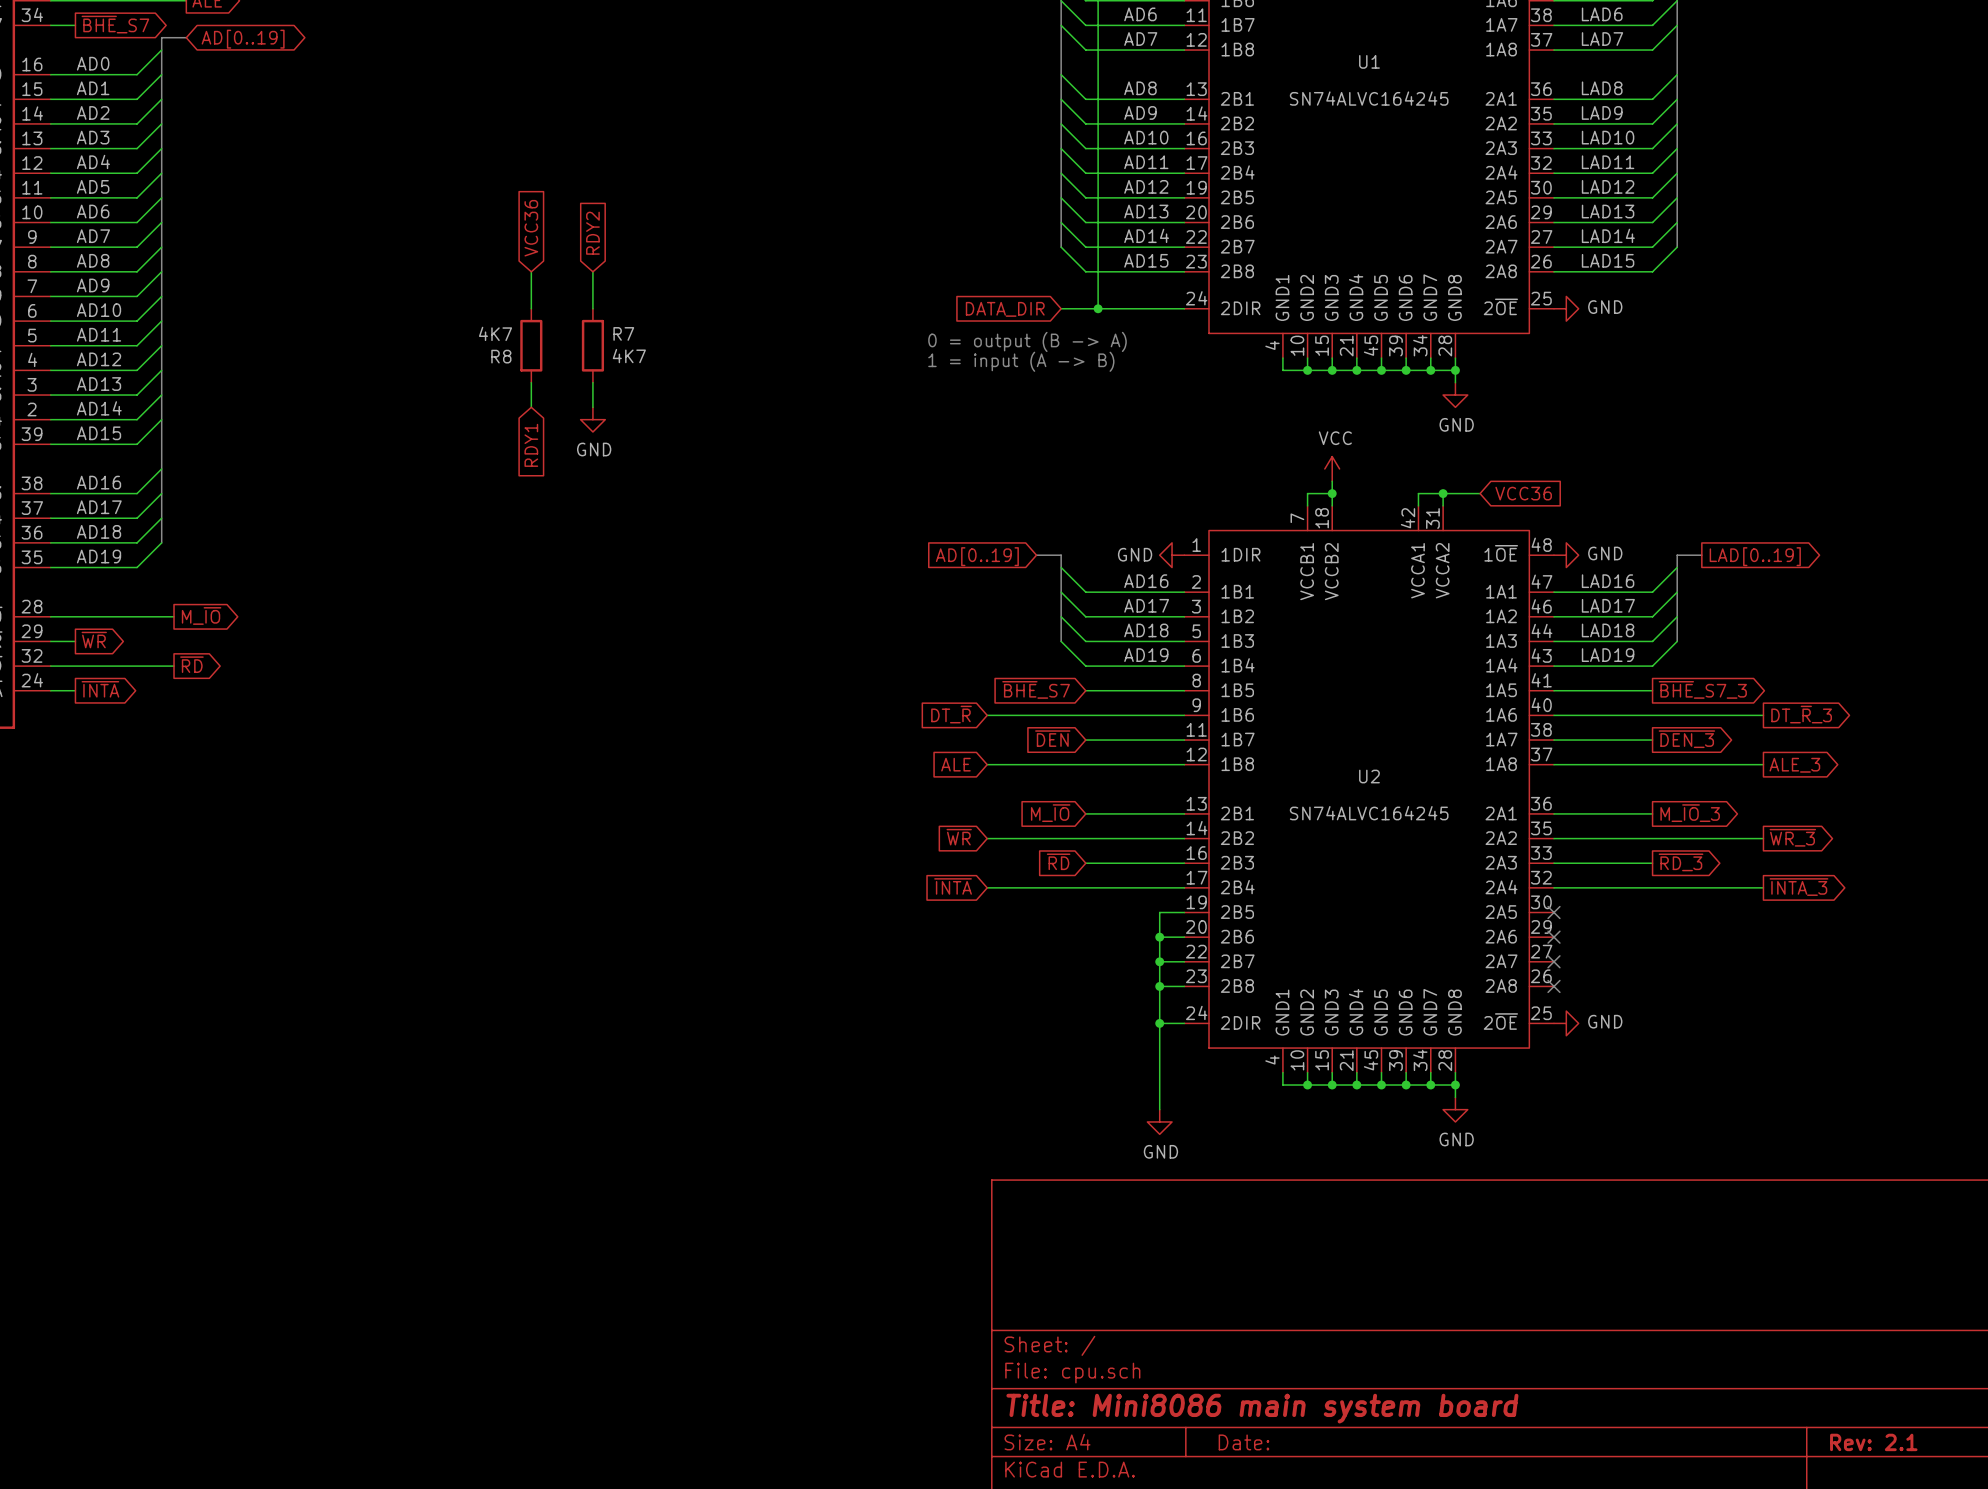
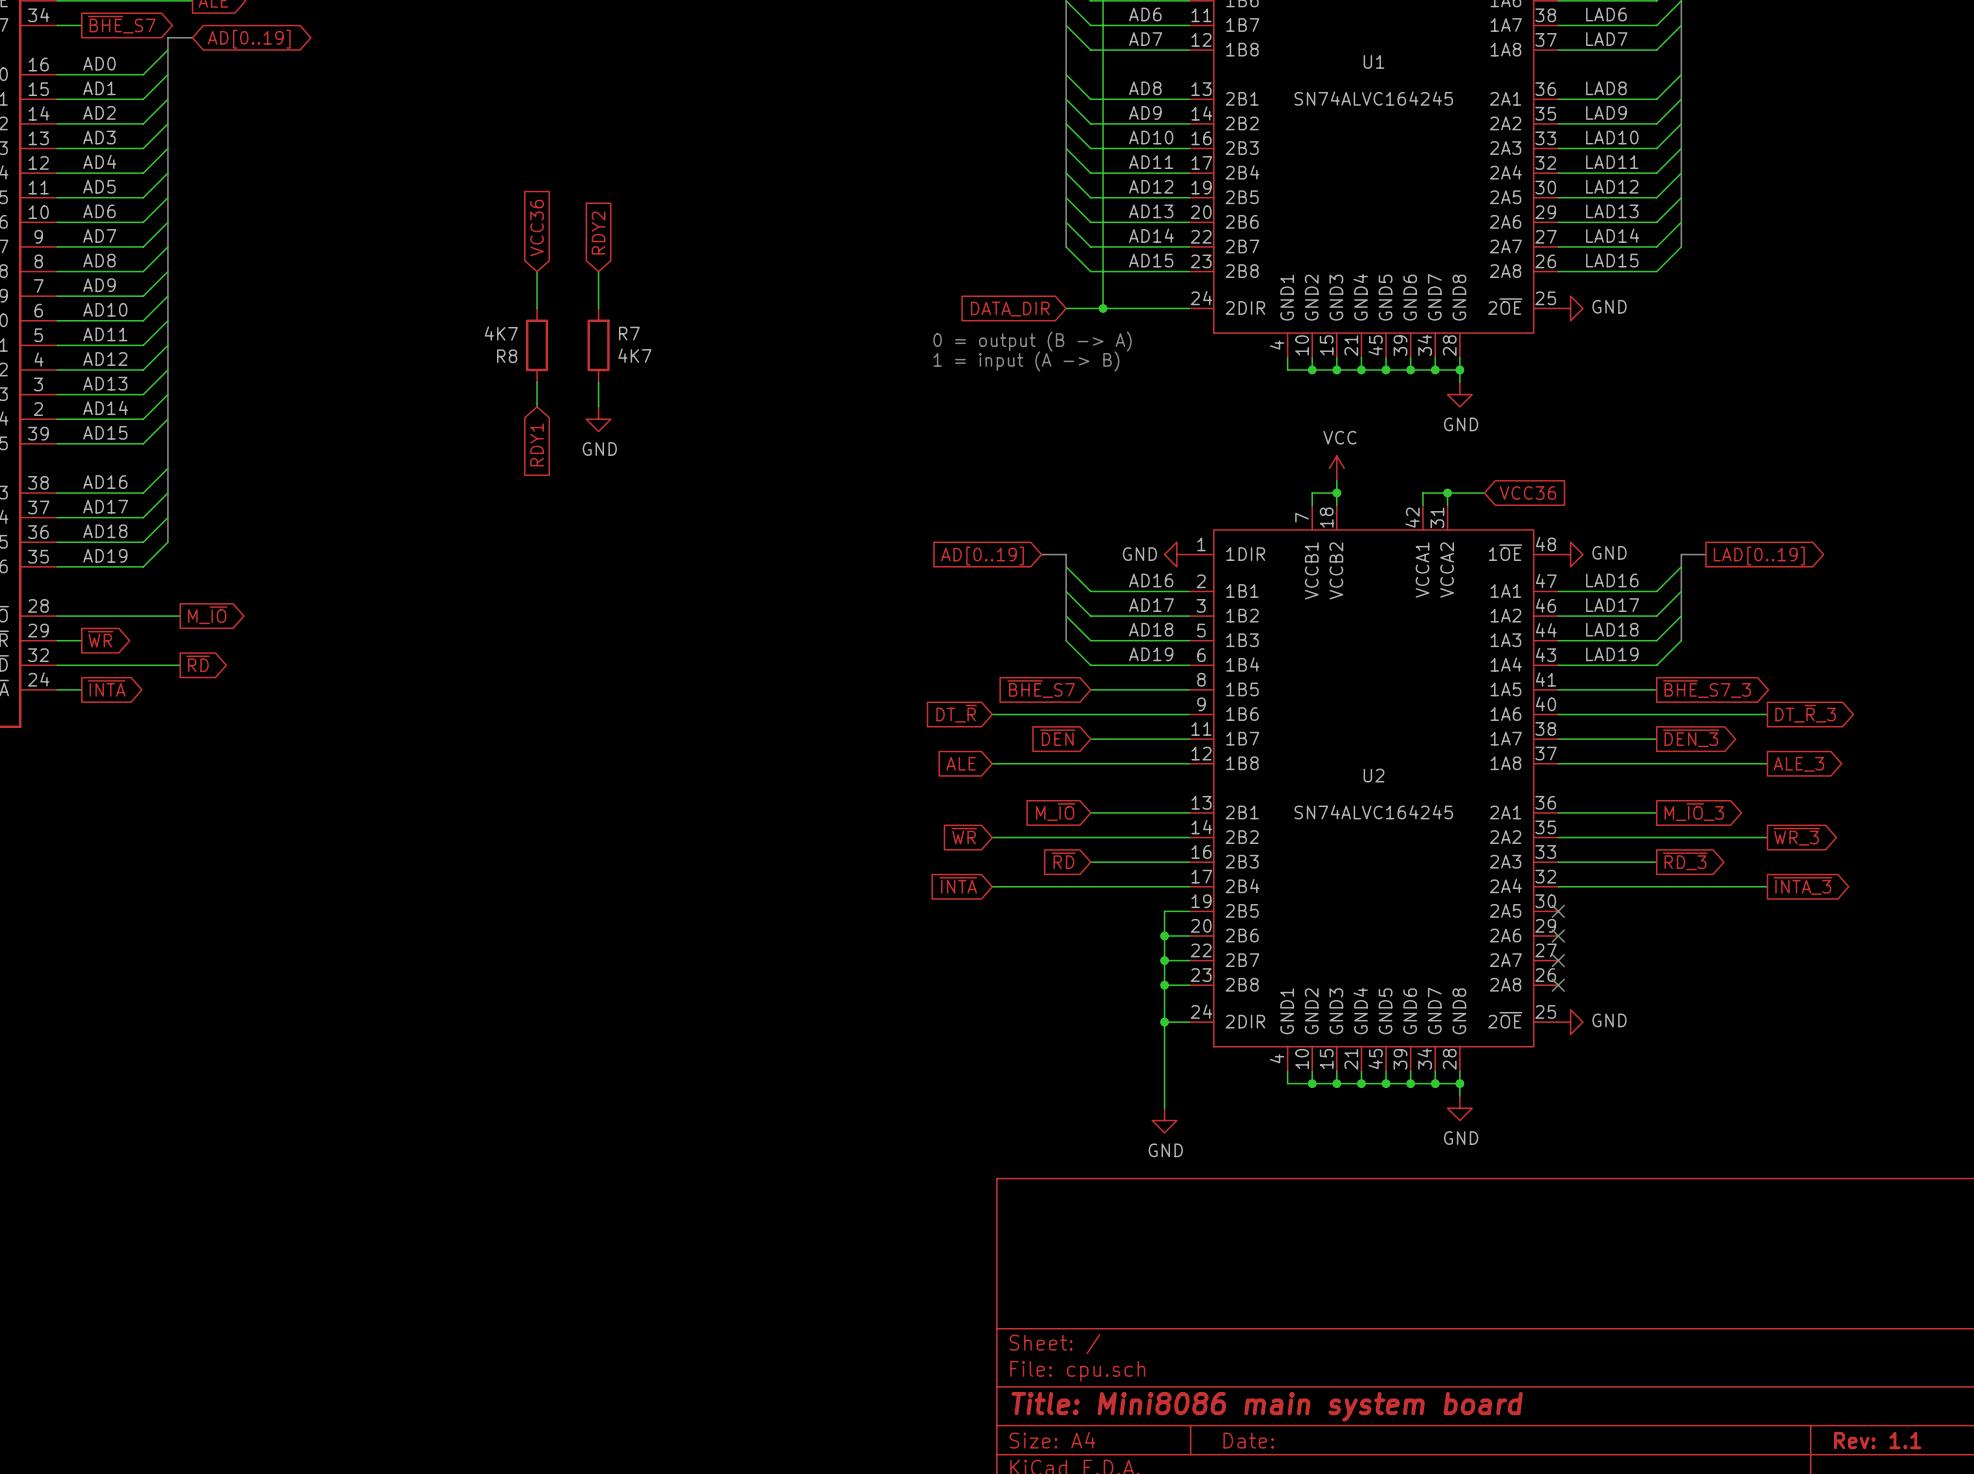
title block: Rev: 2.1 (1873, 1442) -> Rev: 1.1 (1877, 1440)

